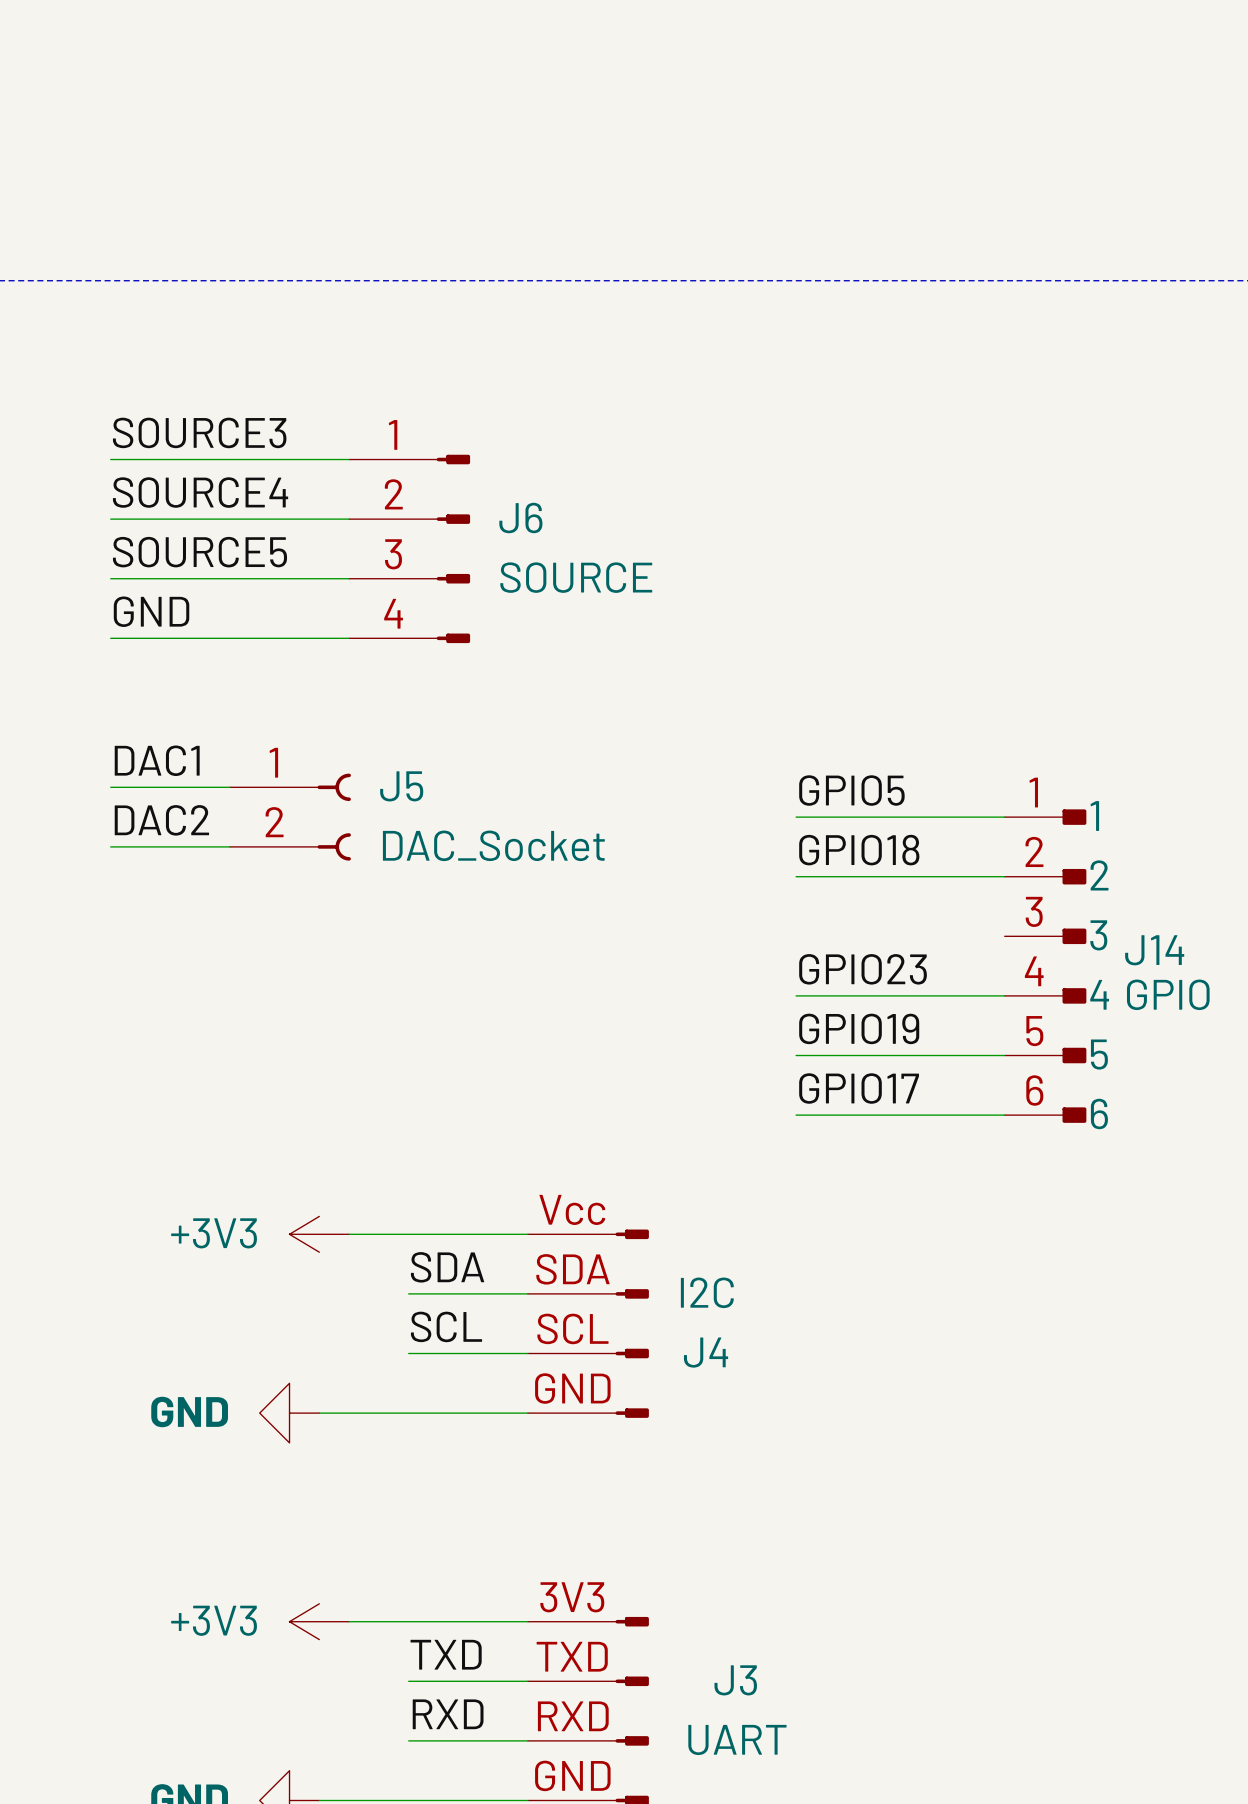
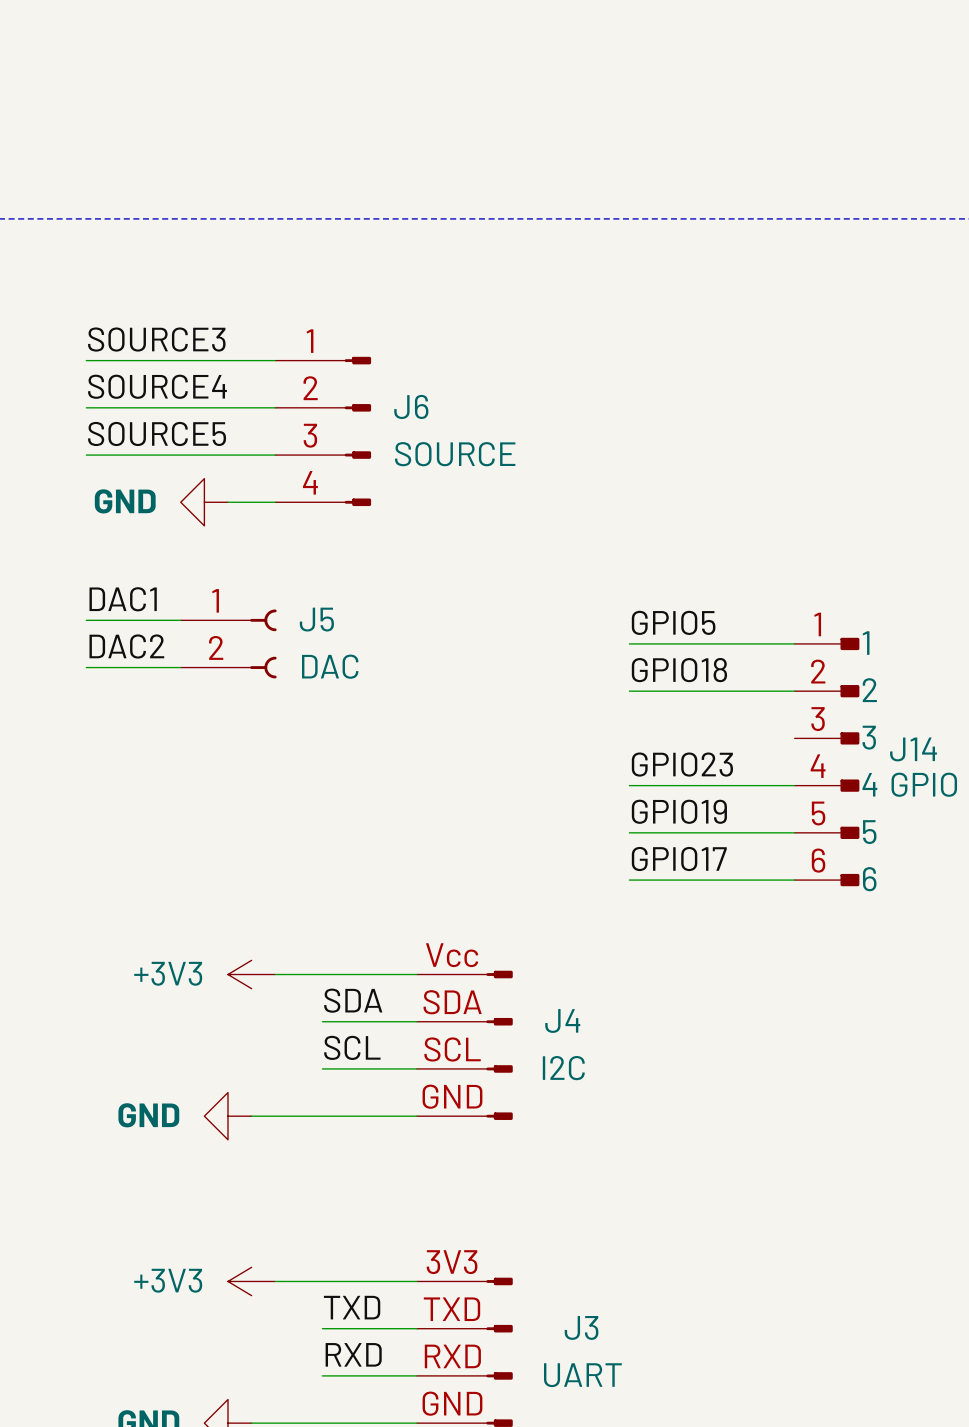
label: GND (151, 611) -> none
wire: (110, 638) (289, 638) -> none
power symbol: none -> GND (204, 502)
J5 value: DAC_Socket (493, 845) -> DAC (330, 666)
J4 value position: I2C (707, 1292) -> I2C (563, 1068)
J4 name position: J4 (706, 1352) -> J4 (562, 1020)

